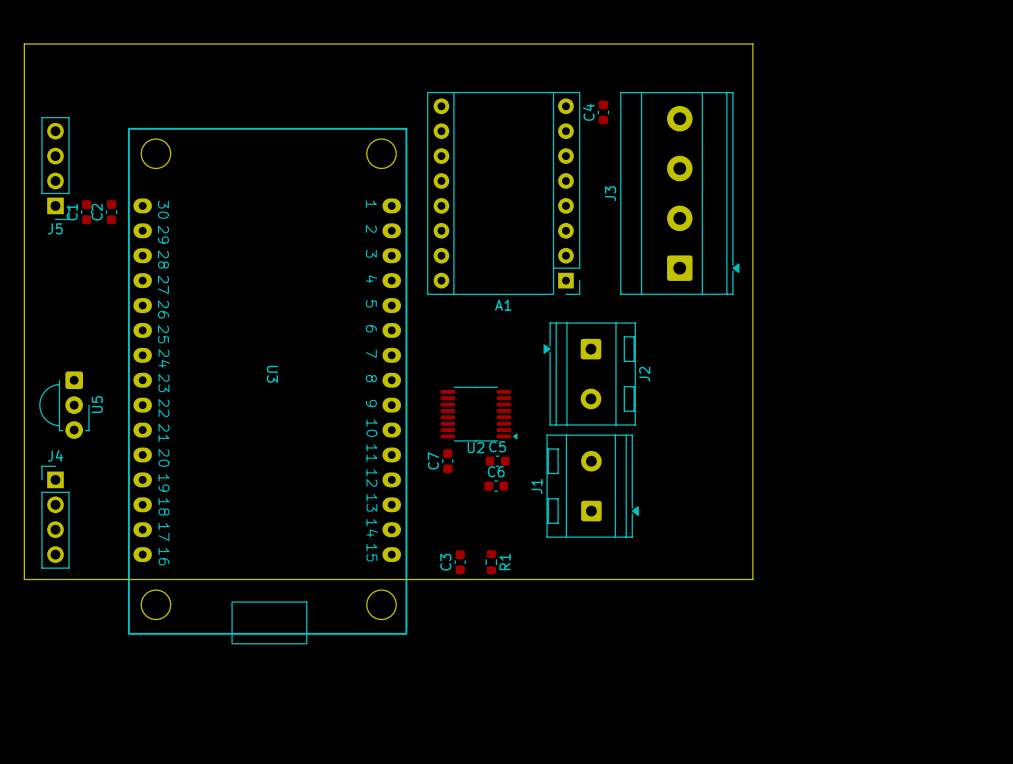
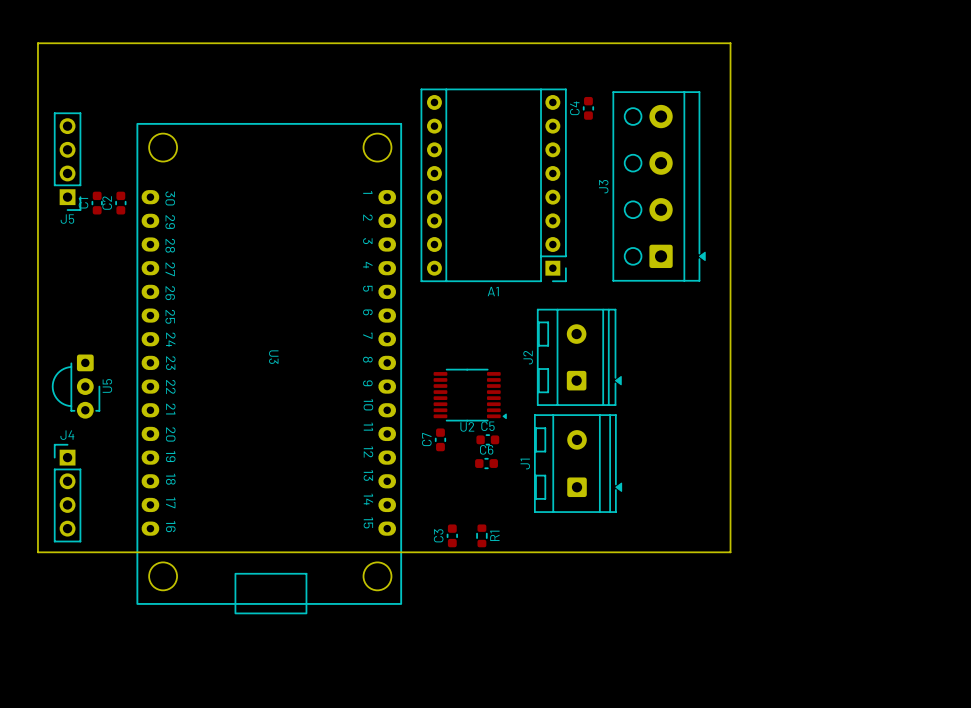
J3 footprint: [620, 92, 740, 295] -> [612, 91, 706, 282]
J2 footprint: [543, 322, 636, 426] -> [537, 309, 622, 406]
J2 name position: J2 (644, 374) -> J2 (528, 357)

